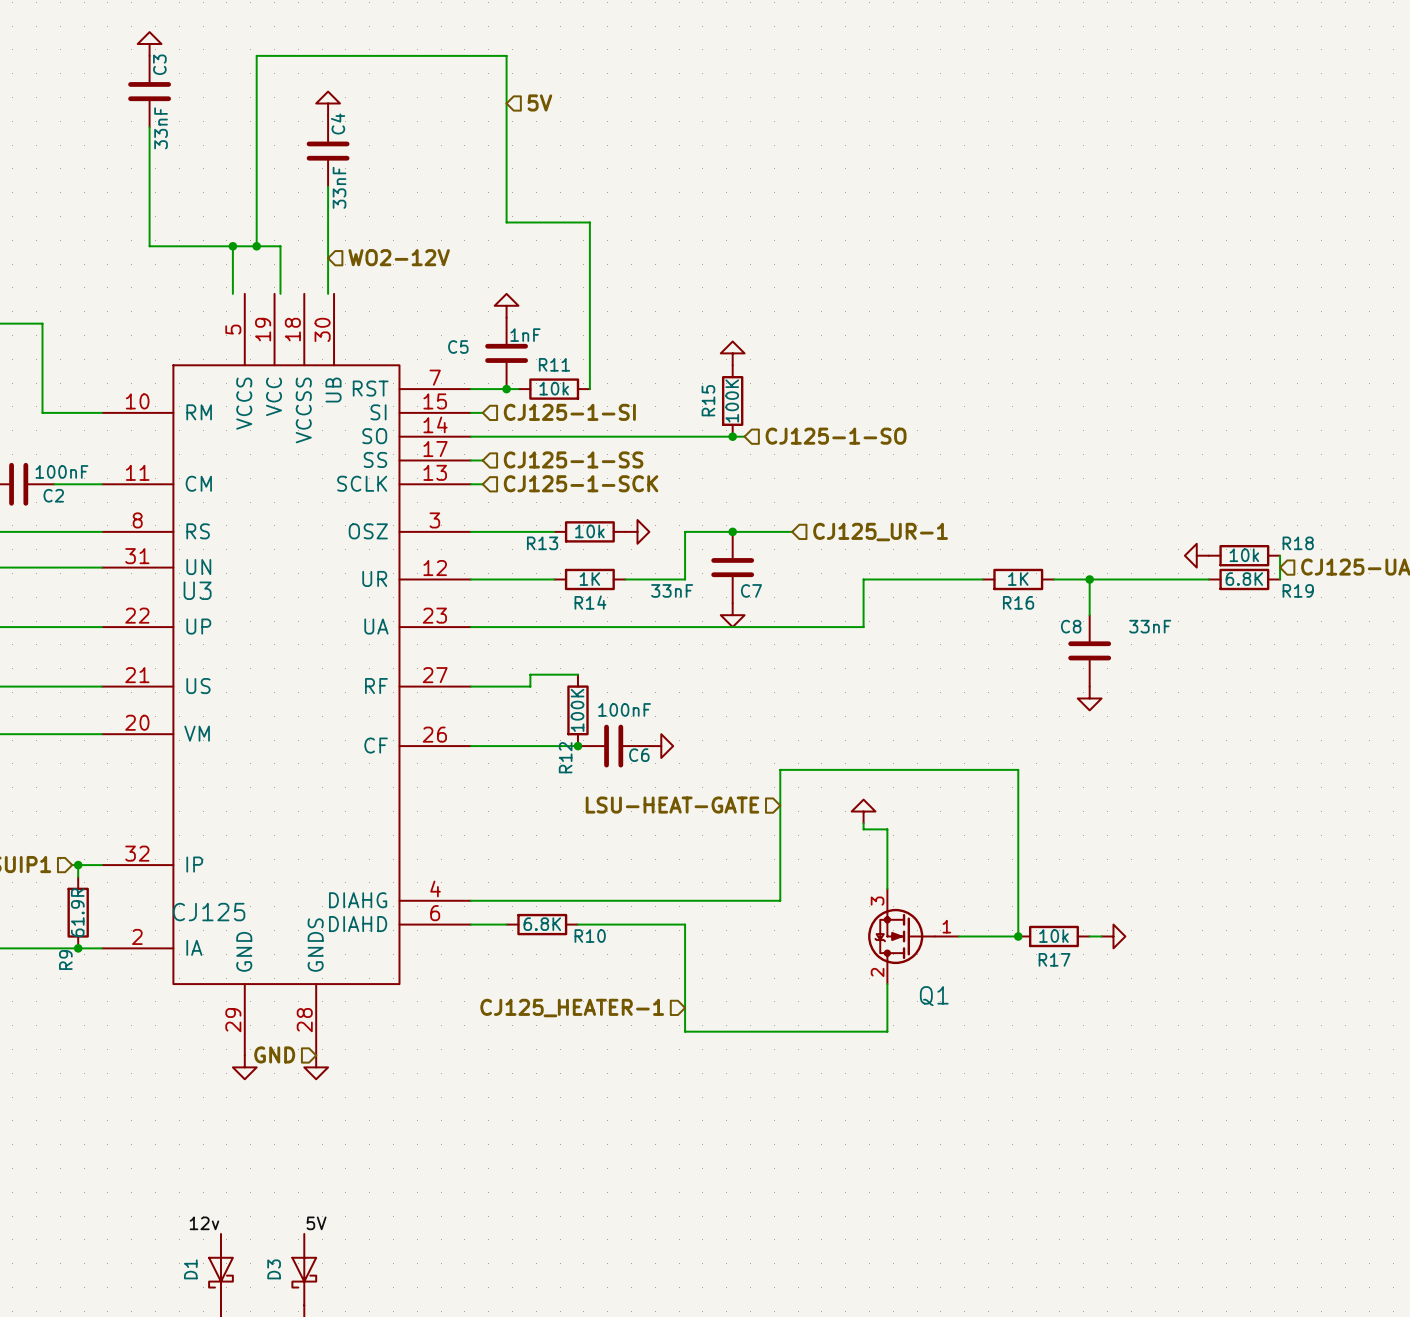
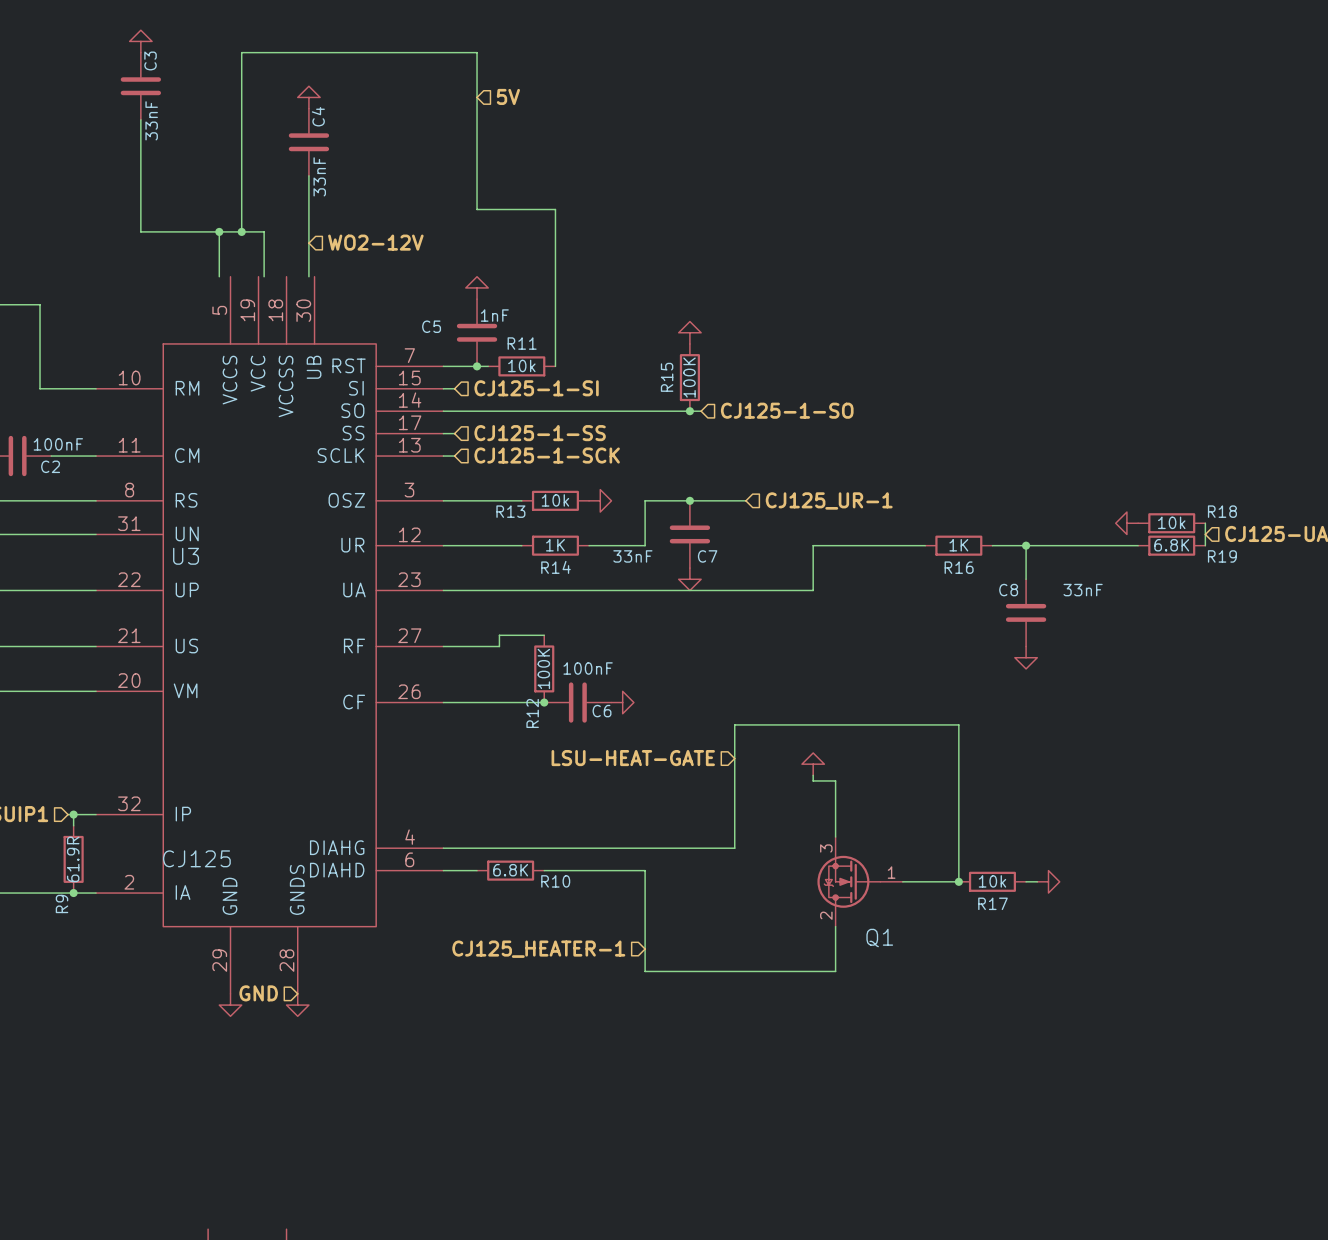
label: 12v (204, 1223) -> none
label: 5V (316, 1223) -> none
D1: (220, 1269) -> none
D3: (304, 1269) -> none

